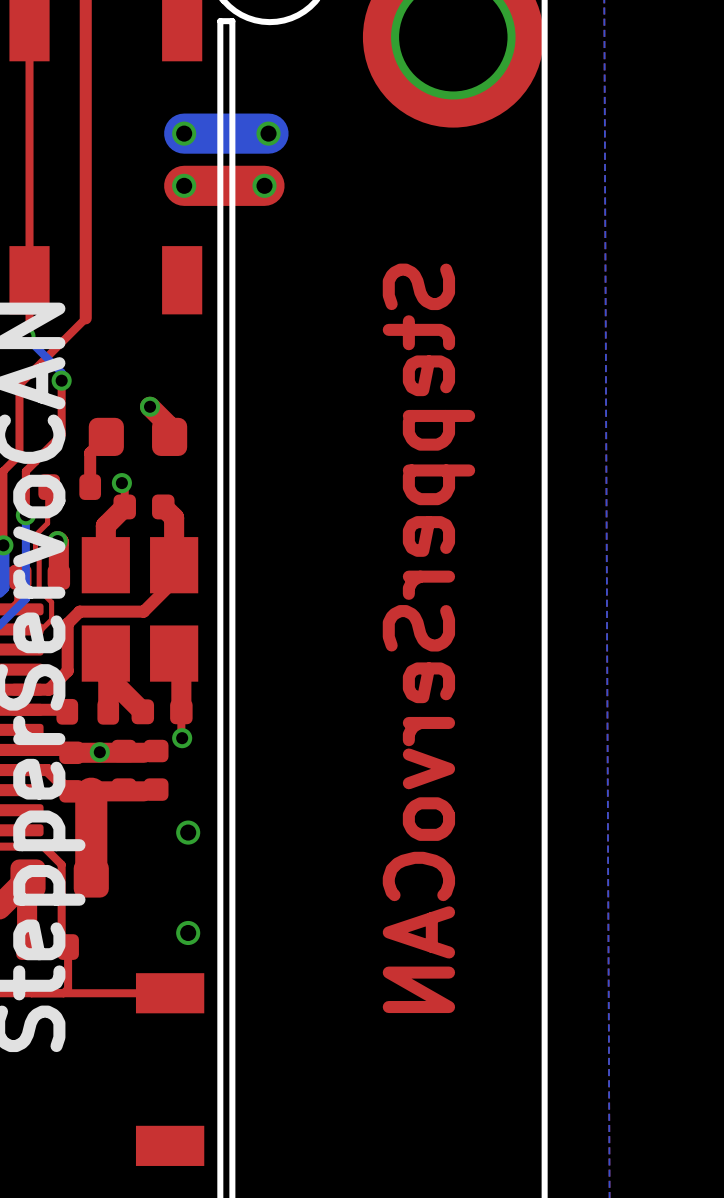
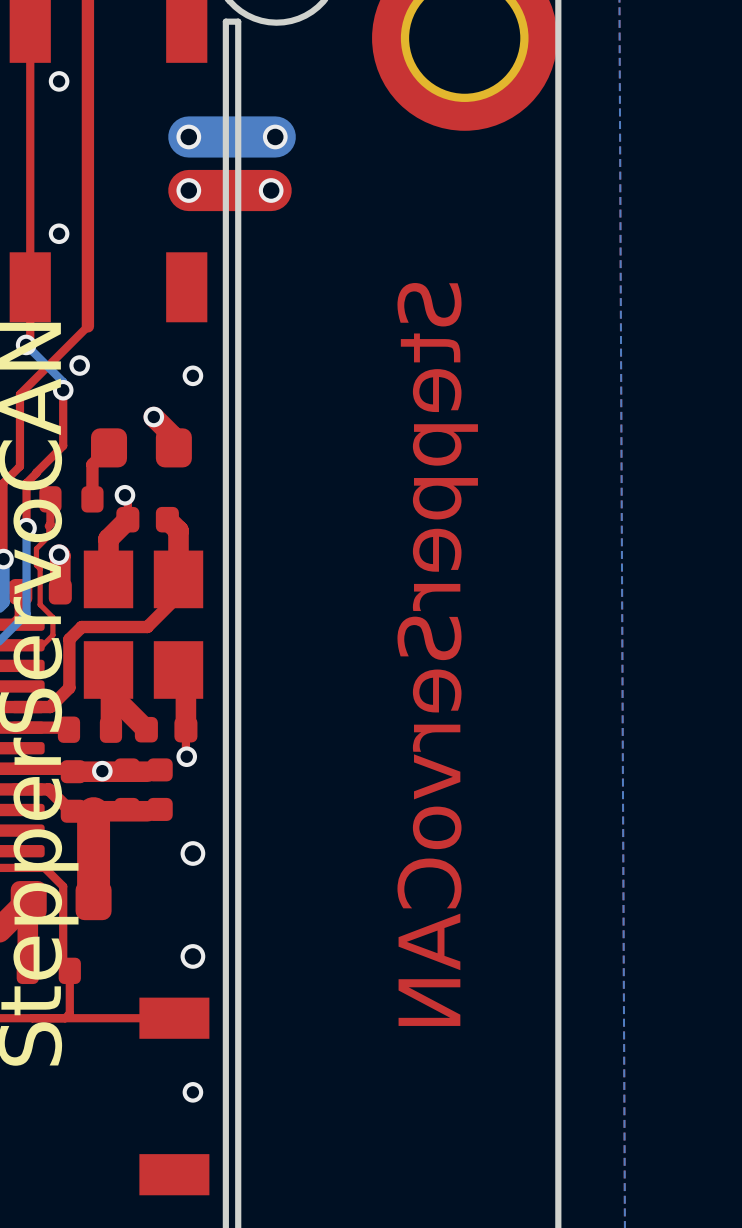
via: none -> (59, 81)
via: none -> (59, 233)
via: none -> (79, 365)
via: none -> (192, 375)
via: none -> (192, 1092)

